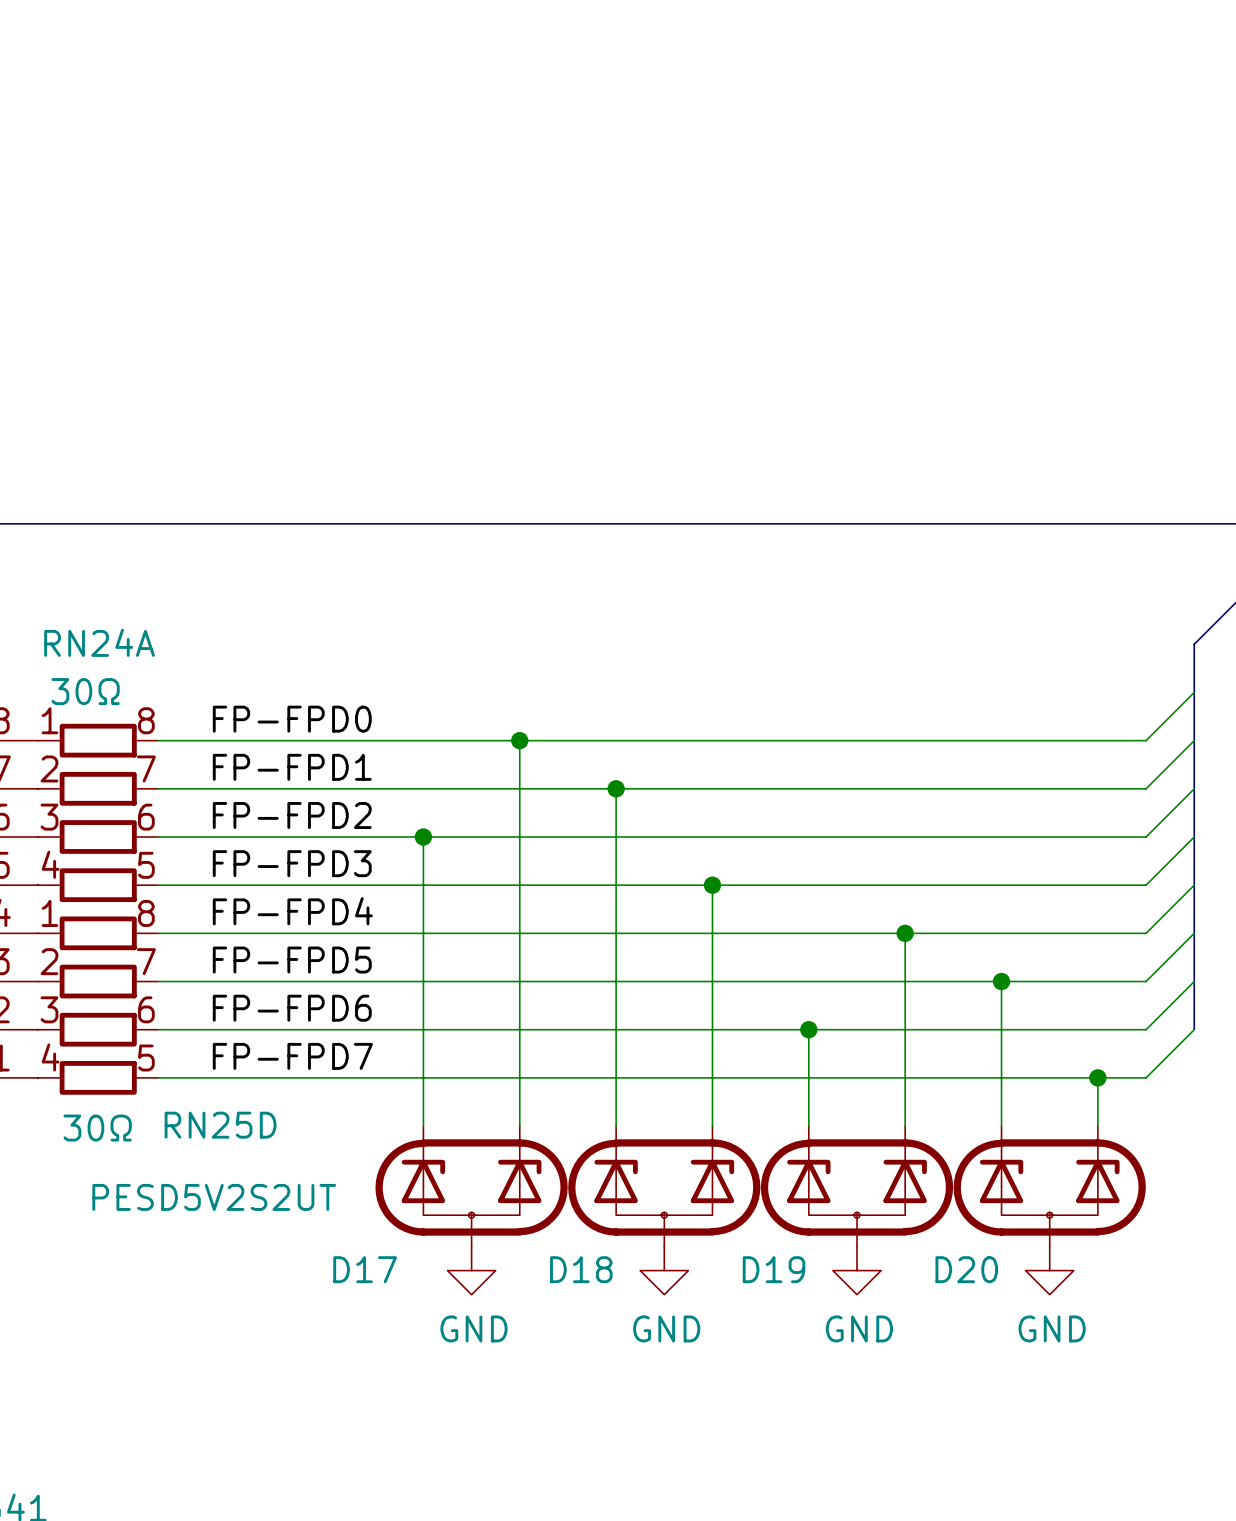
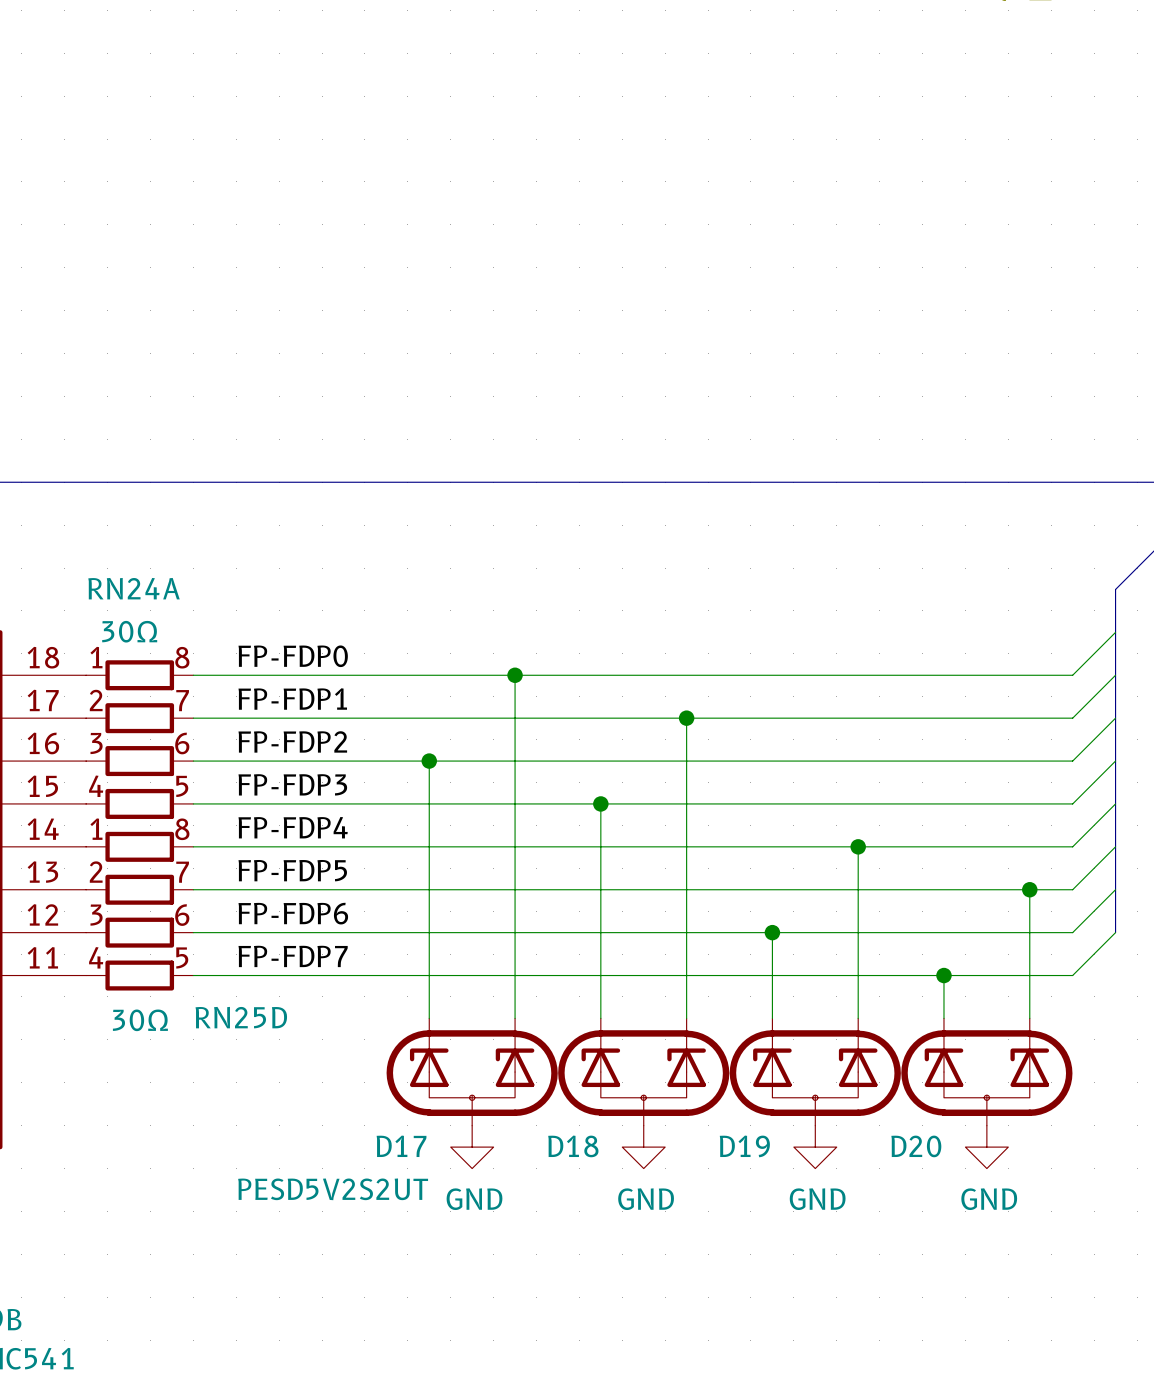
label: FP-FPD0 (292, 719) -> FP-FDP0 (293, 656)
label: FP-FPD1 (292, 767) -> FP-FDP1 (292, 699)
wire: (616, 788) (616, 885) -> (686, 718) (686, 803)
junction: (616, 788) -> none
junction: none -> (686, 718)
label: FP-FPD2 (292, 815) -> FP-FDP2 (292, 741)
label: FP-FPD3 (292, 863) -> FP-FDP3 (292, 784)
junction: none -> (600, 803)
junction: (712, 885) -> none
label: FP-FPD4 (292, 911) -> FP-FDP4 (293, 827)
label: FP-FPD5 (292, 960) -> FP-FDP5 (292, 870)
wire: (1001, 981) (1001, 1077) -> (1029, 889) (1029, 975)
junction: (1001, 981) -> none
junction: none -> (1029, 889)
label: FP-FPD6 (292, 1008) -> FP-FDP6 (293, 913)
label: FP-FPD7 (292, 1056) -> FP-FDP7 (293, 956)
junction: none -> (943, 975)
junction: (1097, 1077) -> none
D17 flip: as is (471, 1187) -> left-right (472, 1073)
D18 flip: as is (664, 1187) -> left-right (643, 1073)
D19 flip: as is (857, 1187) -> left-right (815, 1073)
D20 flip: as is (1049, 1187) -> left-right (986, 1073)
D17 value position: PESD5V2S2UT (214, 1197) -> PESD5V2S2UT (333, 1189)

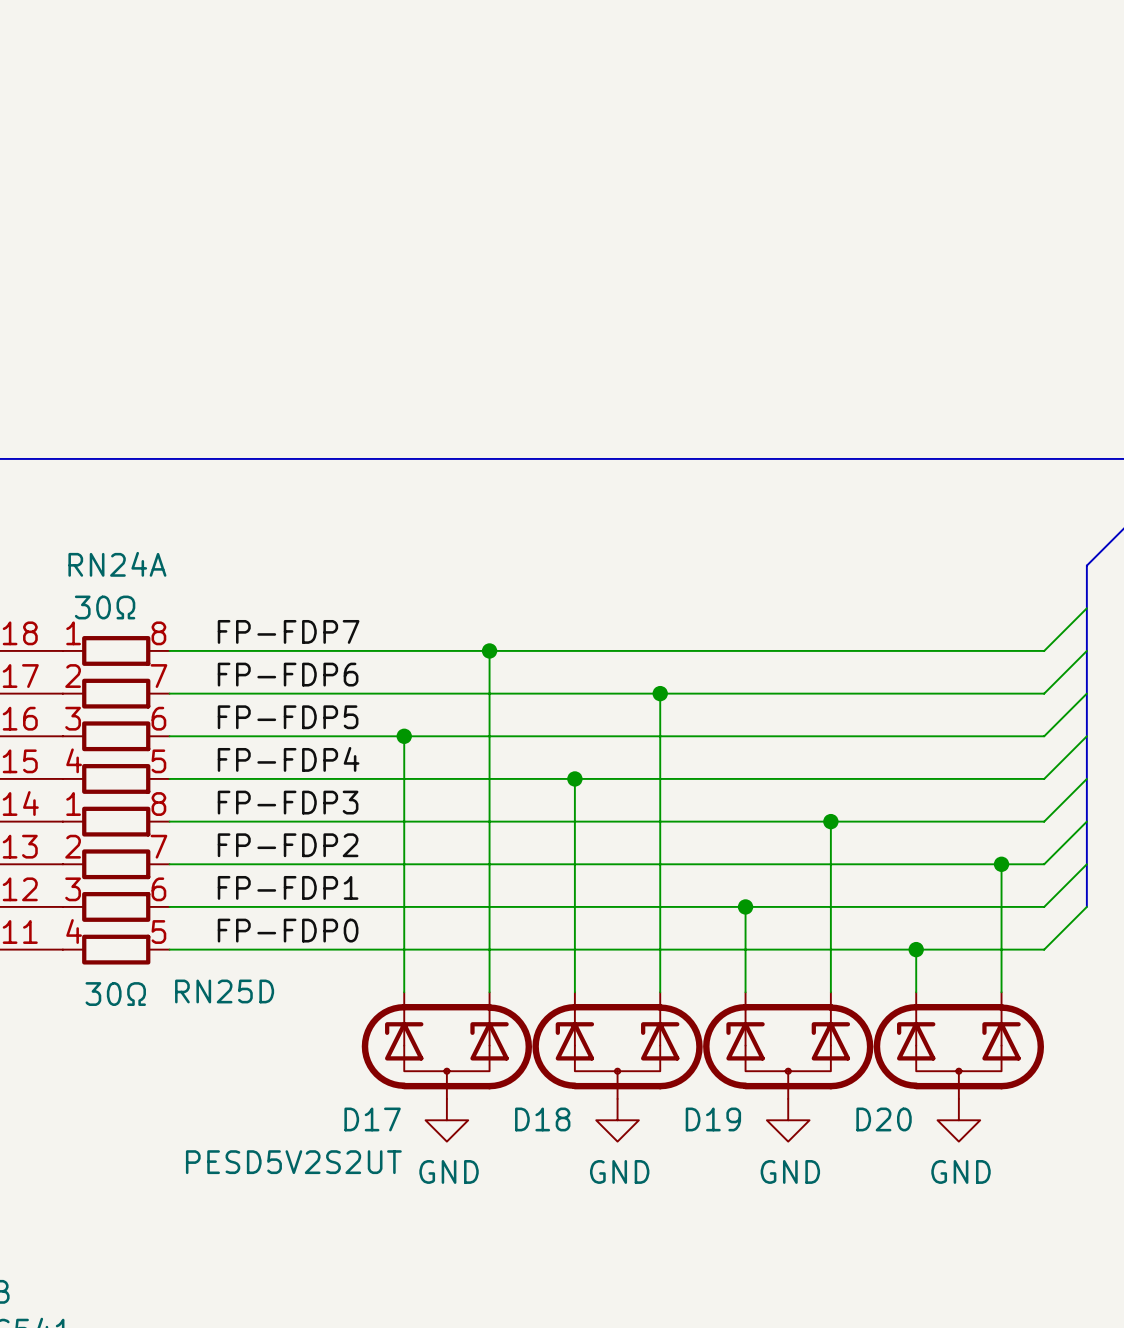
label: FP-FDP0 (293, 656) -> FP-FDP7 (288, 631)
label: FP-FDP1 (292, 699) -> FP-FDP6 (288, 674)
label: FP-FDP2 (292, 741) -> FP-FDP5 (288, 717)
label: FP-FDP3 (292, 784) -> FP-FDP4 (288, 759)
label: FP-FDP4 (293, 827) -> FP-FDP3 (288, 802)
label: FP-FDP5 (292, 870) -> FP-FDP2 (288, 845)
label: FP-FDP6 (293, 913) -> FP-FDP1 (288, 887)
label: FP-FDP7 (293, 956) -> FP-FDP0 (288, 930)

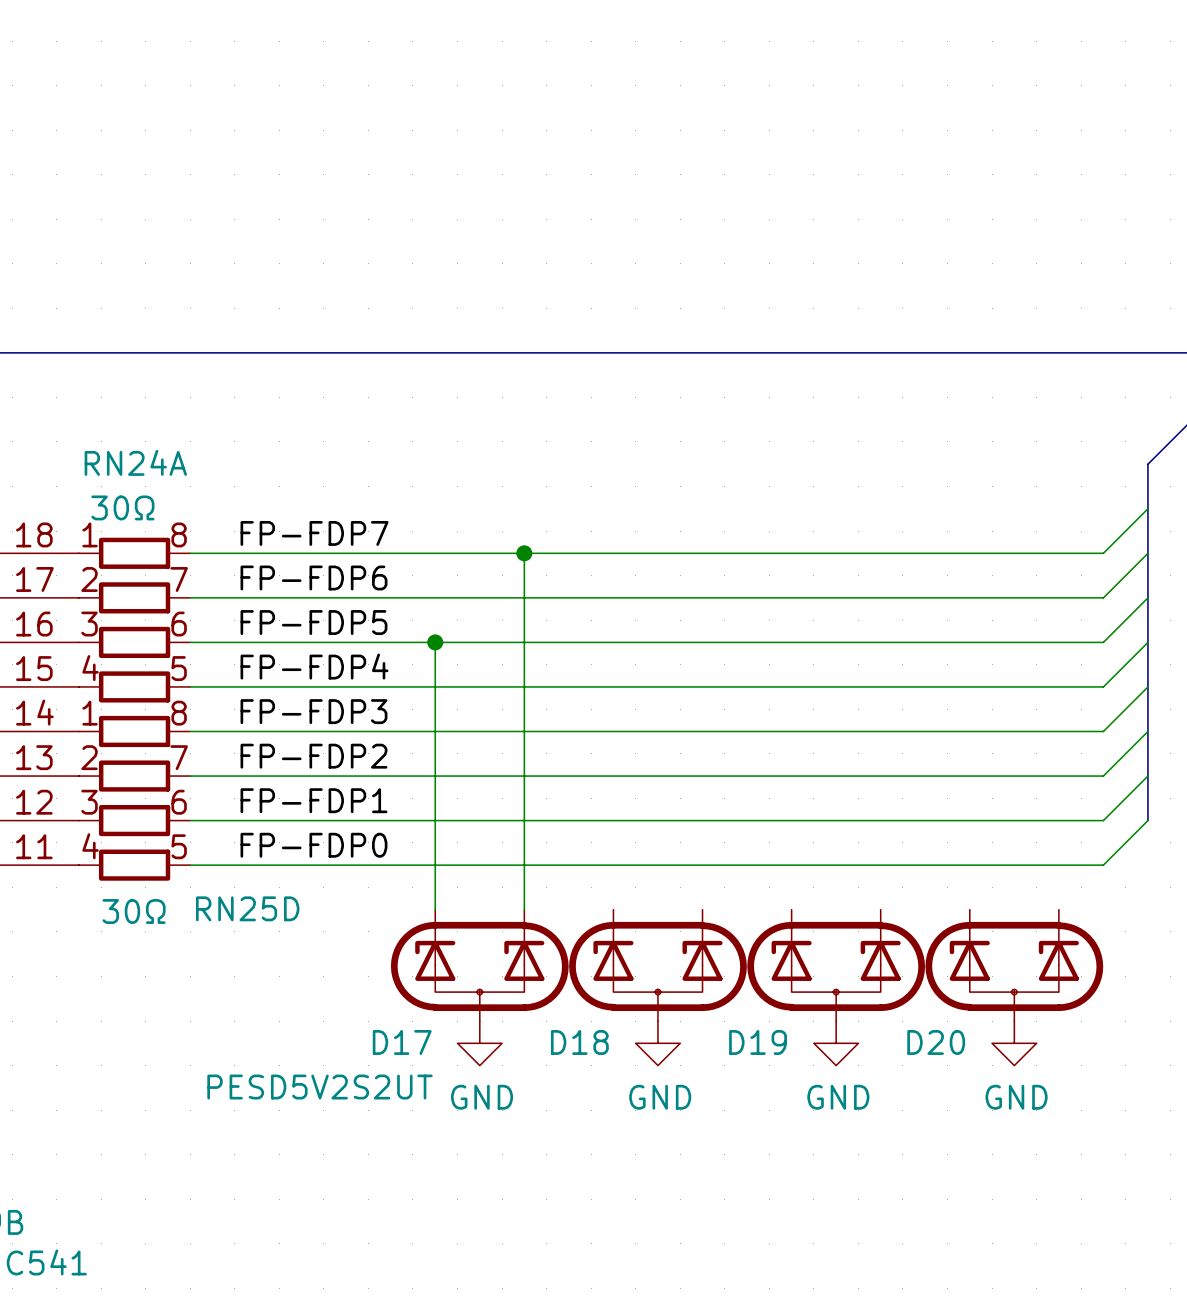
wire: (660, 693) (660, 992) -> none
junction: (660, 693) -> none
wire: (574, 778) (574, 992) -> none
junction: (574, 778) -> none
wire: (830, 821) (830, 992) -> none
junction: (830, 821) -> none
wire: (1001, 864) (1001, 992) -> none
junction: (1001, 864) -> none
wire: (745, 906) (745, 992) -> none
junction: (745, 906) -> none
wire: (916, 949) (916, 992) -> none
junction: (916, 949) -> none

